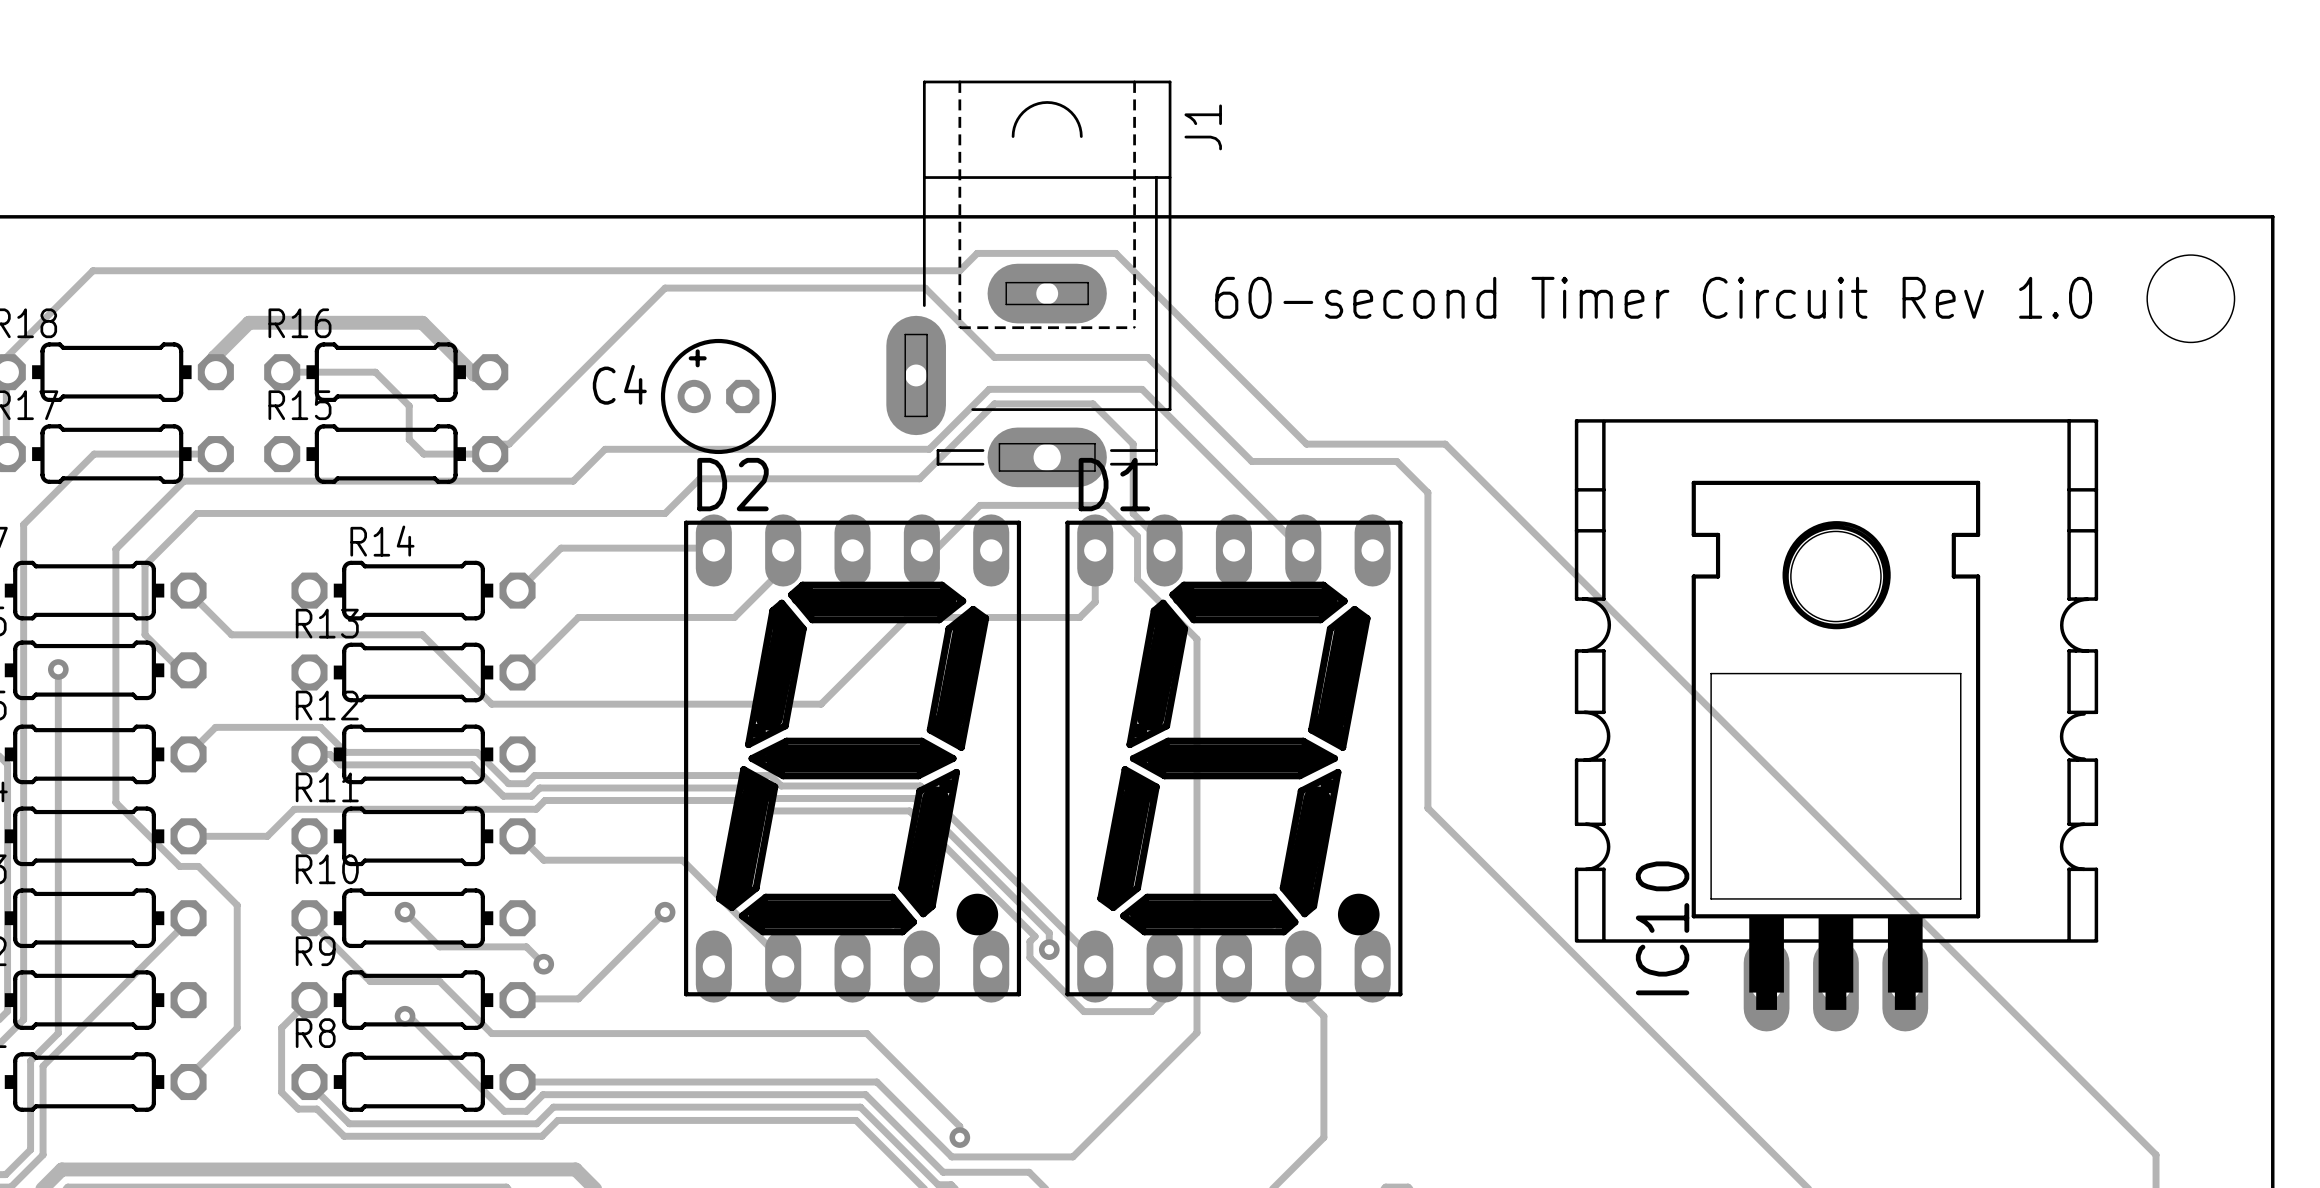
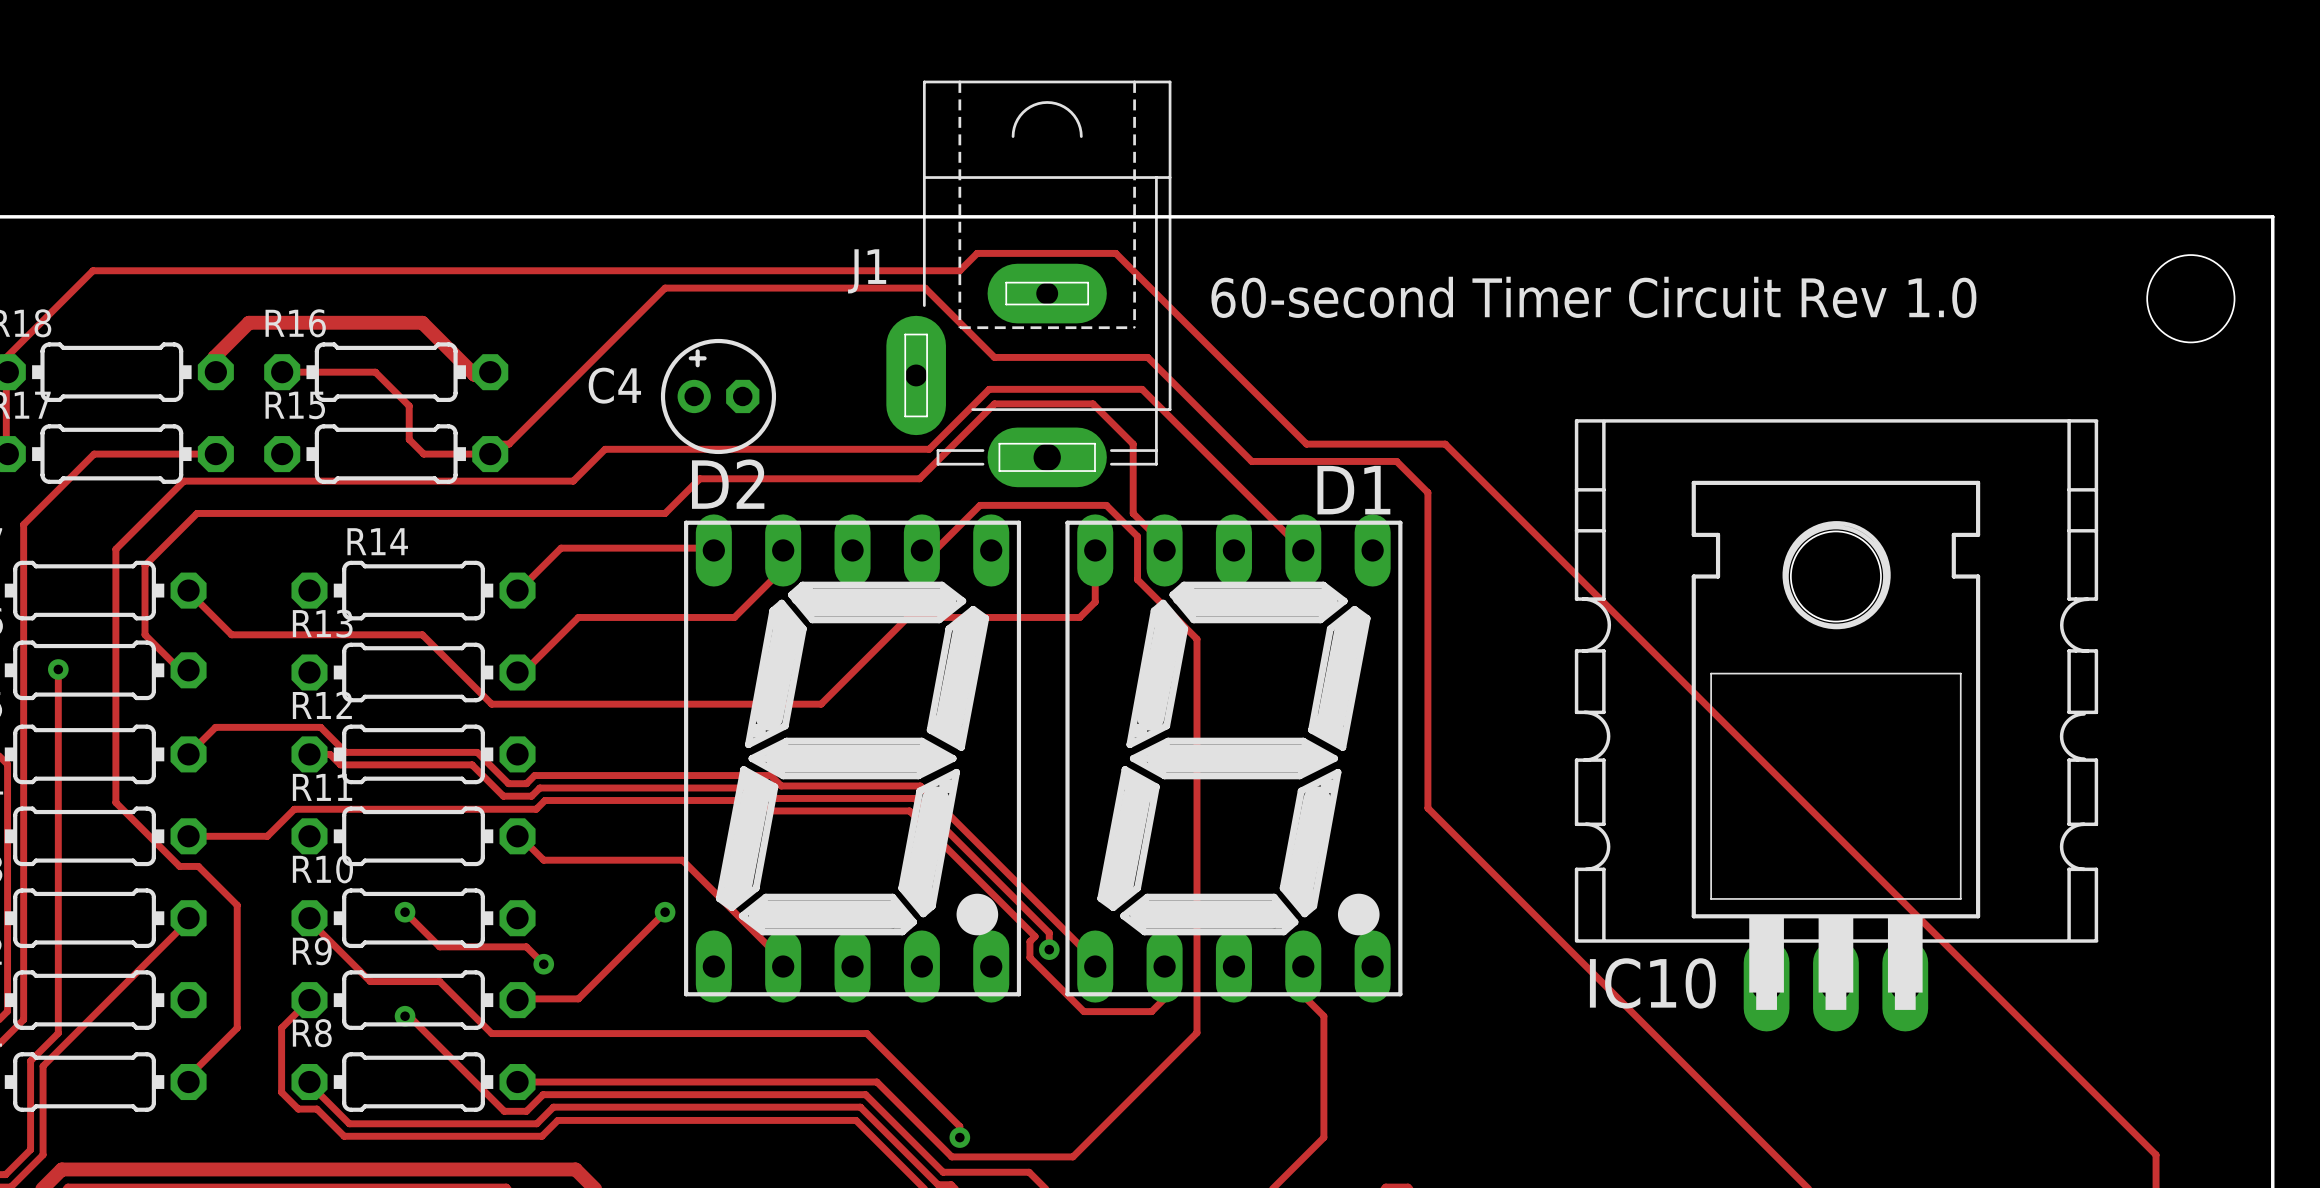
J1 name rotation: 0° (1203, 127) -> 90° clockwise (867, 271)
J1 name position: J1 (1203, 127) -> J1 (867, 271)
D1 name position: D1 (1114, 484) -> D1 (1353, 490)
IC10 name rotation: 0° (1662, 928) -> 90° clockwise (1652, 983)

